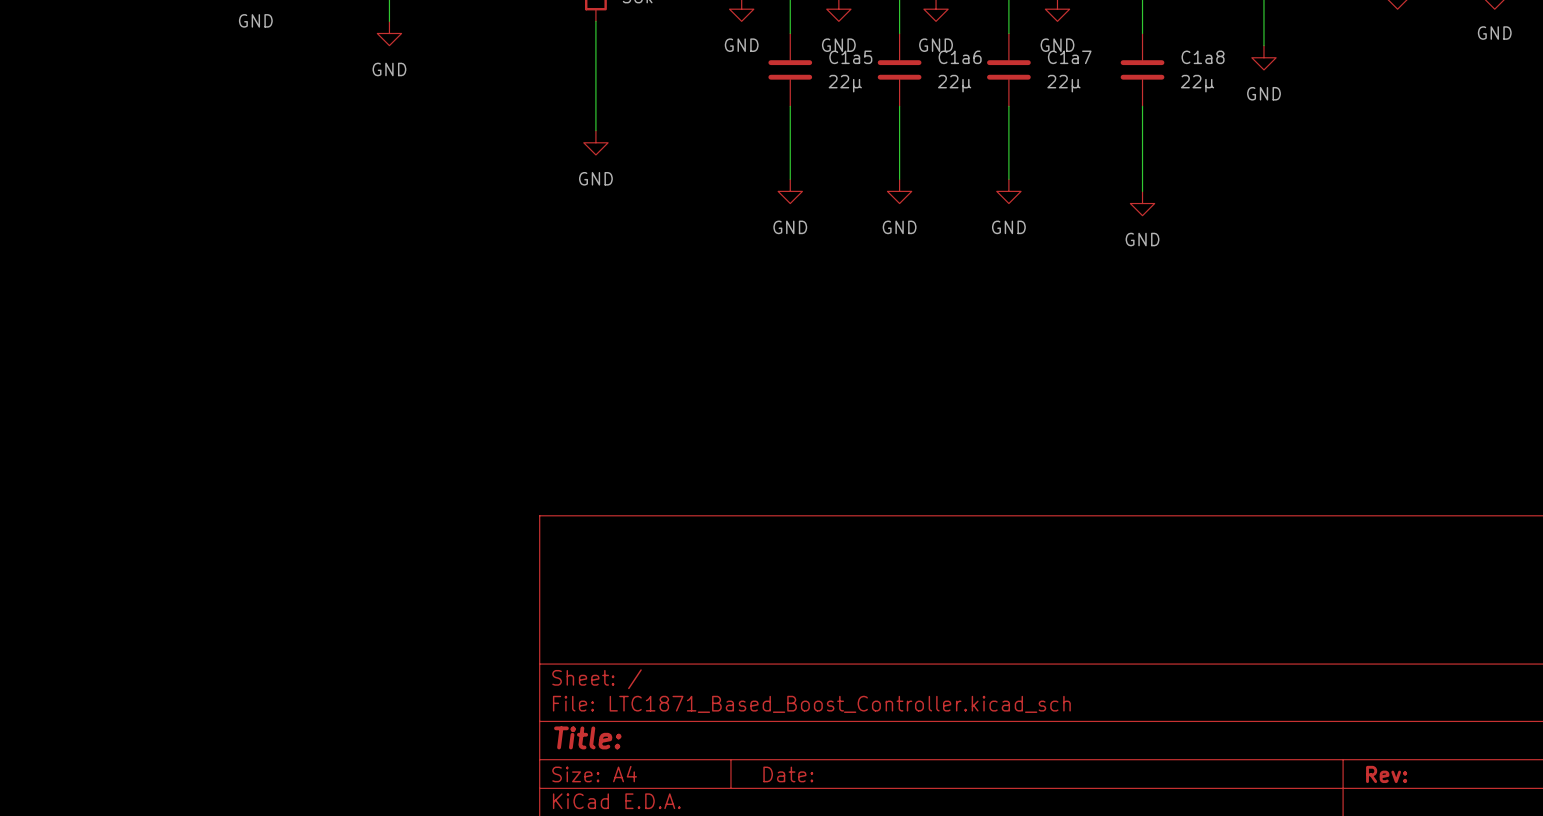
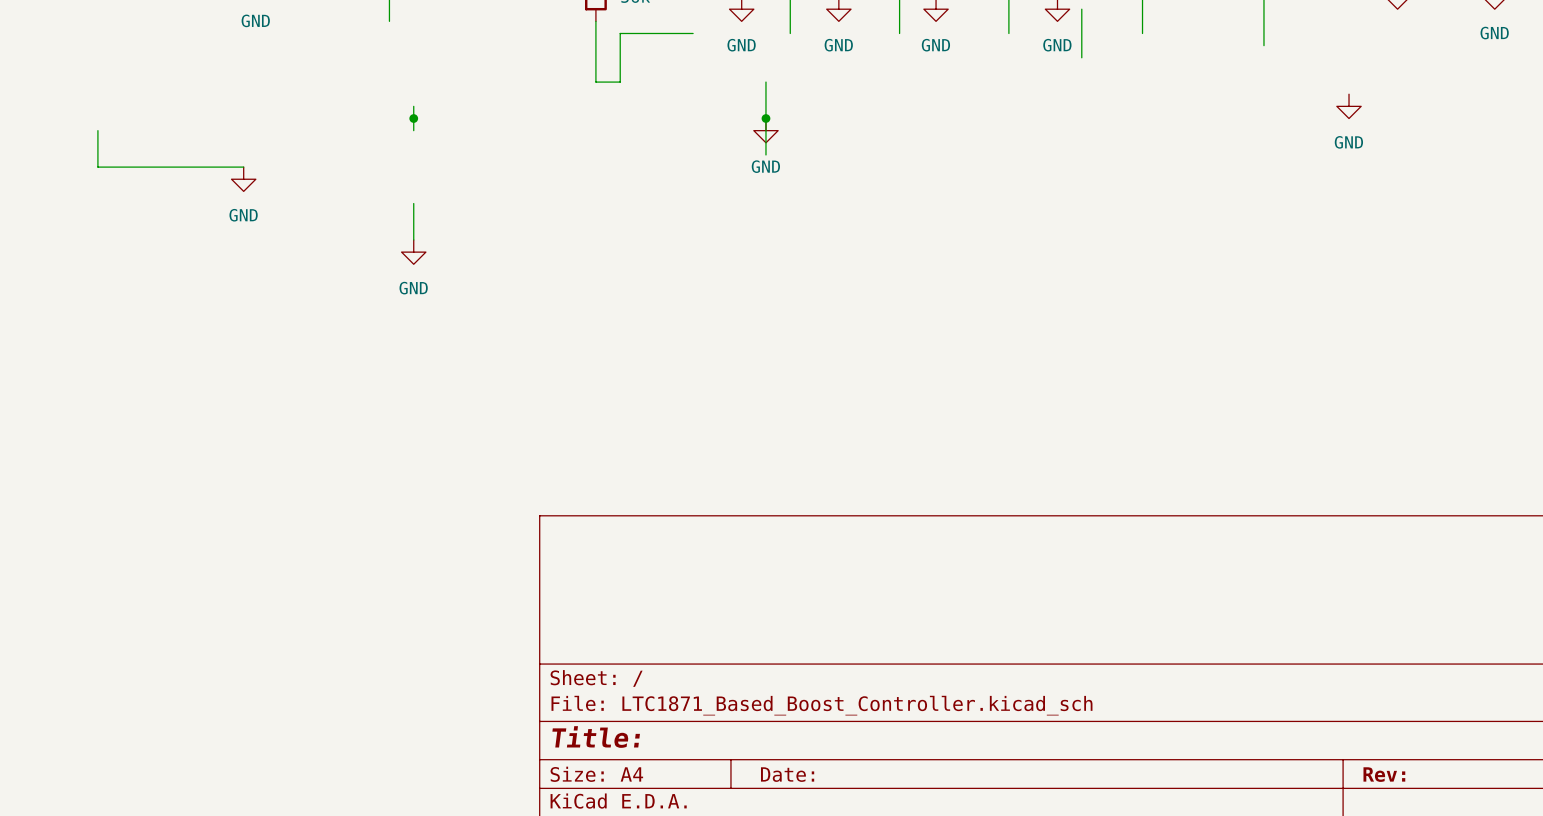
wire: none -> (1081, 9) (1081, 57)
power symbol: GND (389, 33) -> none
power symbol position: GND (1263, 57) -> GND (1349, 106)
C1a5: 22µ (790, 69) -> none
C1a6: 22µ (899, 69) -> none
C1a7: 22µ (1008, 69) -> none
C1a8: 22µ (1142, 69) -> none
wire: (595, 82) (595, 130) -> (595, 82) (620, 82) (620, 33) (693, 33)
wire: none -> (413, 106) (413, 130)
wire: (790, 106) (790, 179) -> (765, 82) (765, 154)
wire: (899, 106) (899, 179) -> none
wire: (1008, 106) (1008, 179) -> none
wire: (1142, 106) (1142, 191) -> none
junction: none -> (413, 118)
junction: none -> (765, 118)
wire: none -> (97, 130) (97, 167) (243, 167)
power symbol: GND (595, 142) -> none
power symbol: none -> GND (243, 179)
power symbol position: GND (790, 191) -> GND (765, 130)
power symbol: GND (899, 191) -> none
power symbol: GND (1008, 191) -> none
wire: none -> (413, 203) (413, 239)
power symbol: GND (1142, 203) -> none
power symbol: none -> GND (413, 252)

